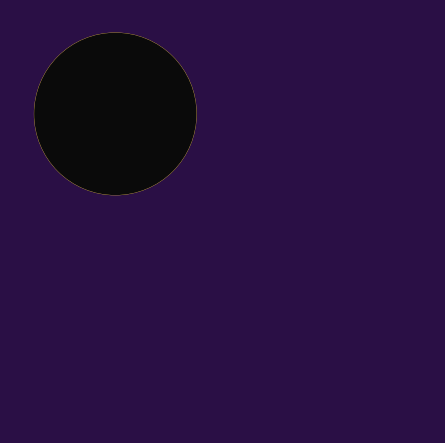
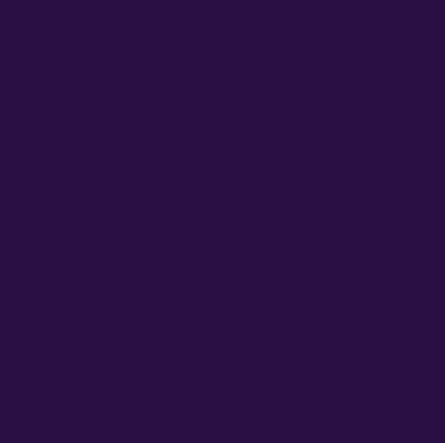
part: (115, 113) -> none

